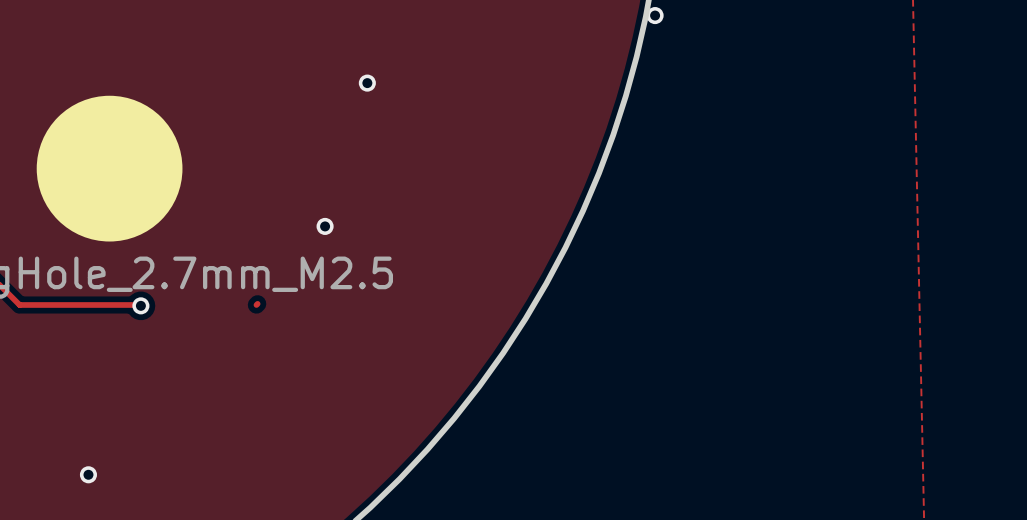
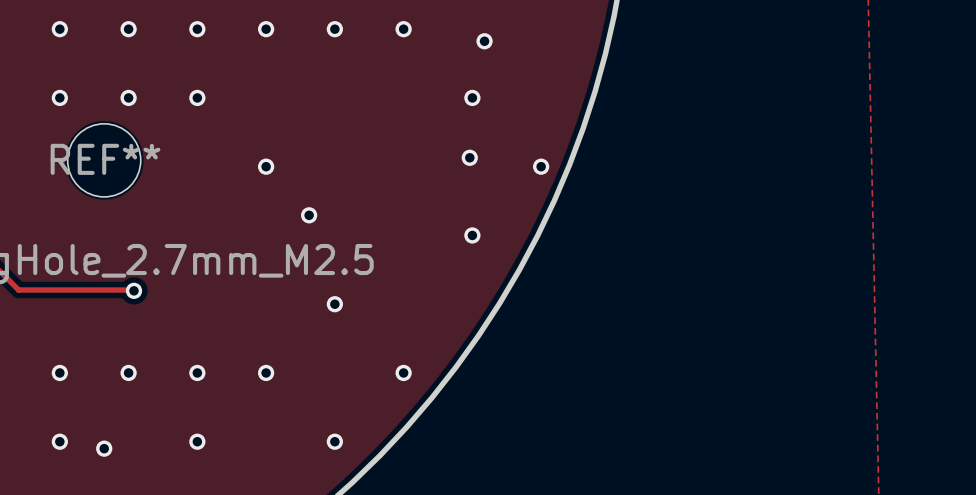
via: (655, 15) -> none
via: none -> (59, 29)
via: none -> (128, 29)
via: none -> (197, 29)
via: none -> (266, 29)
via: none -> (334, 29)
via: none -> (403, 29)
via: none -> (484, 41)
via: (367, 83) -> none
drawing: [36, 95, 183, 242] -> none
via: none -> (59, 97)
via: none -> (128, 97)
via: none -> (197, 97)
via: none -> (472, 97)
via: none -> (469, 157)
via: none -> (266, 166)
via: none -> (541, 166)
via: none -> (472, 235)
track: (257, 303) (256, 304) -> none
via: none -> (334, 304)
via: none -> (59, 372)
via: none -> (128, 372)
via: none -> (197, 372)
via: none -> (266, 372)
via: none -> (403, 372)
via: none -> (59, 441)
via: none -> (197, 441)
via: none -> (334, 441)
via: none -> (104, 448)
via: (88, 474) -> none

